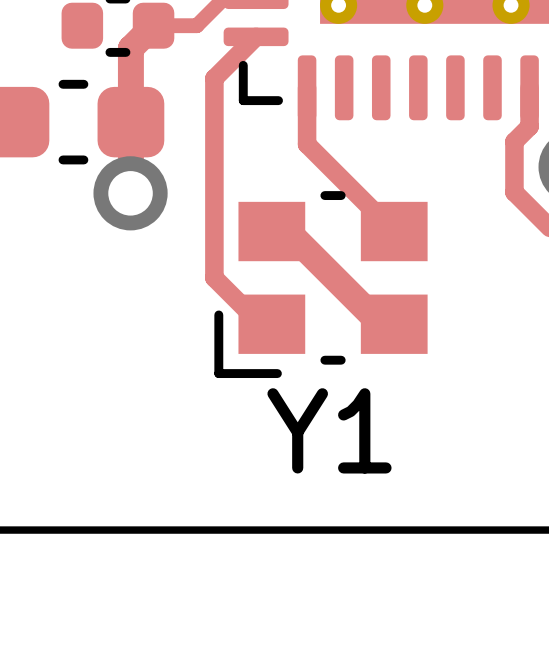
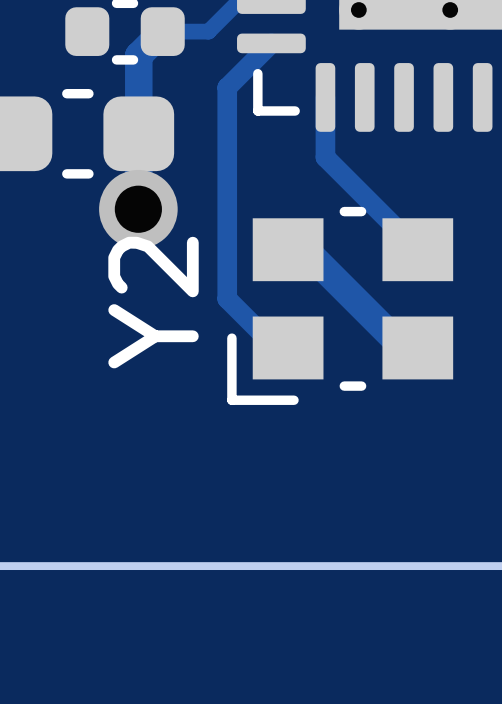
Y1 name: Y1 (329, 430) -> Y2 (153, 302)

